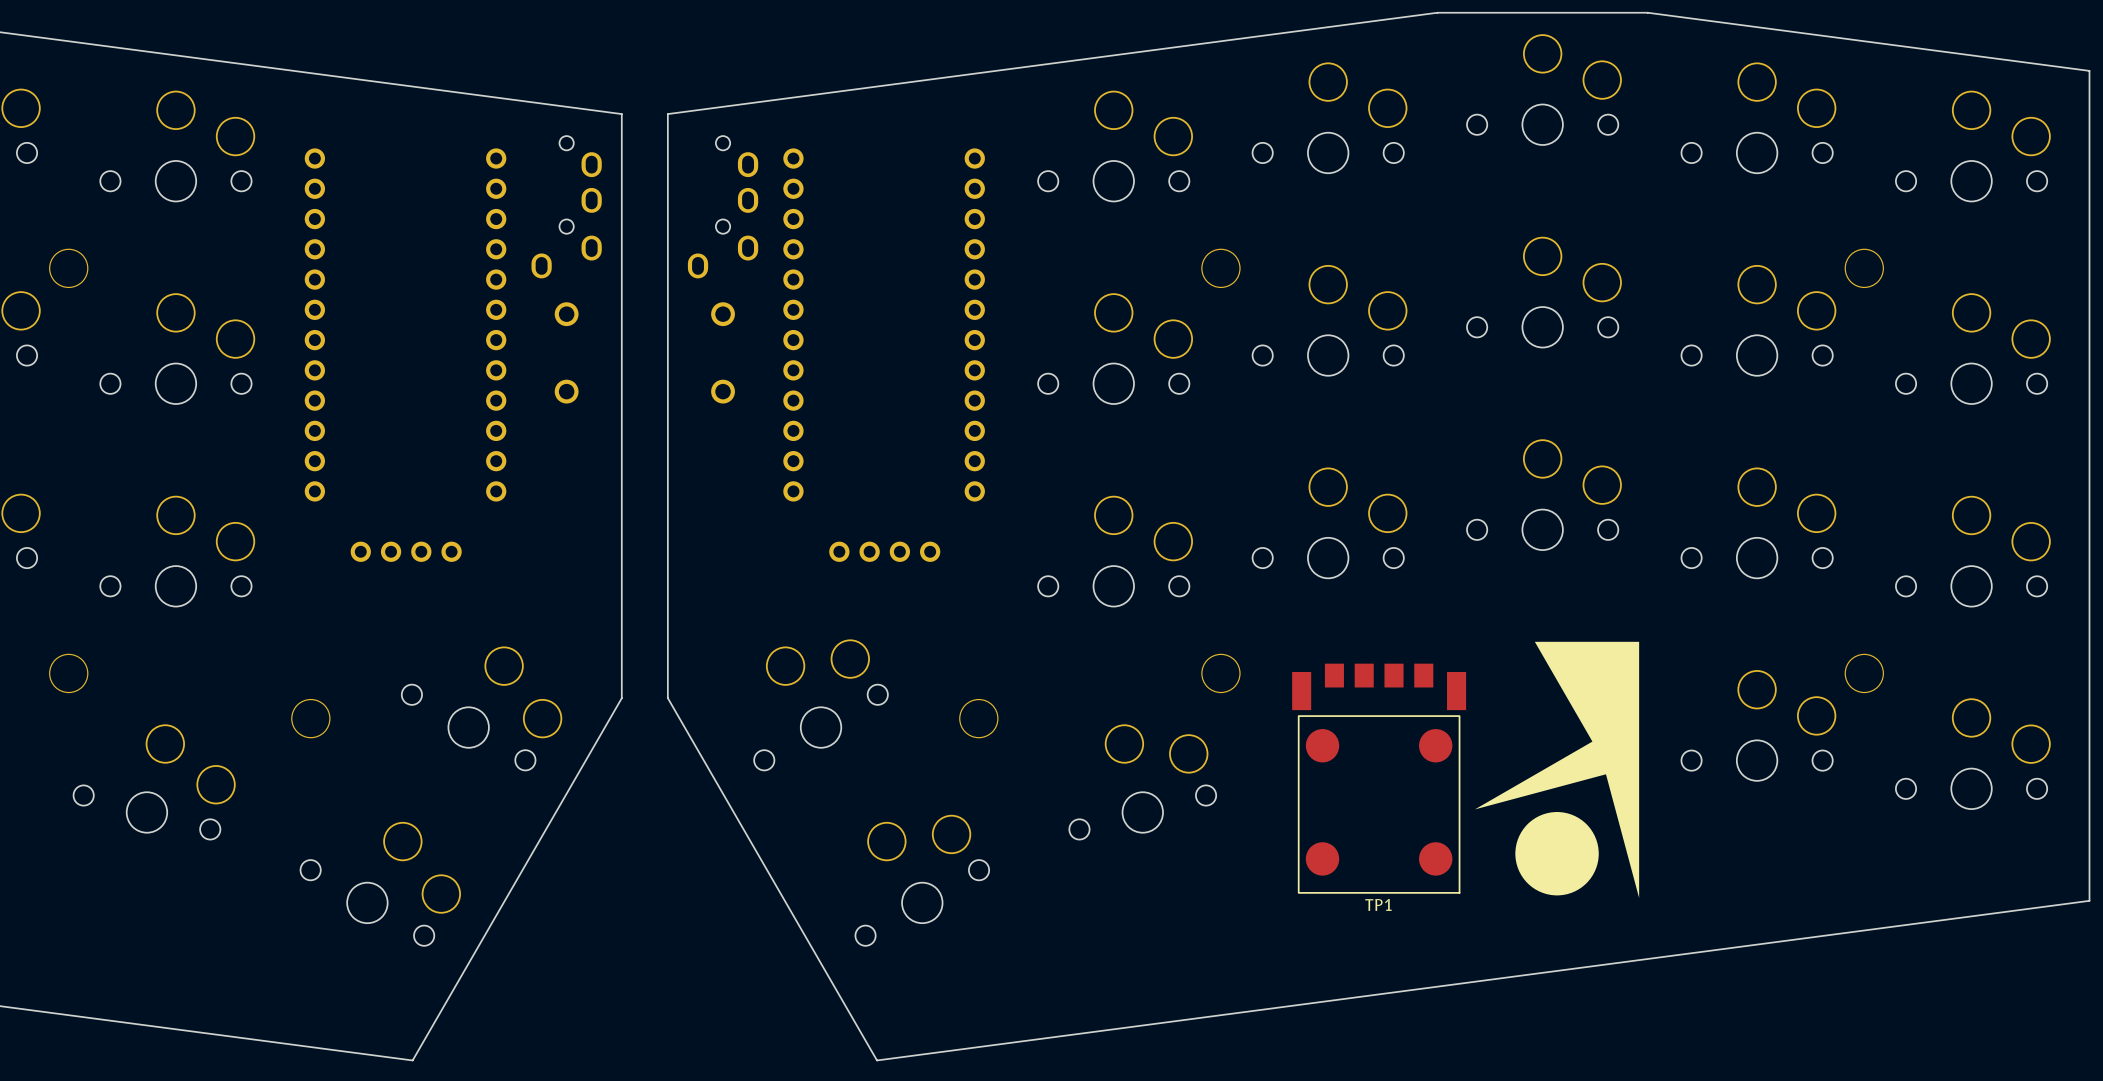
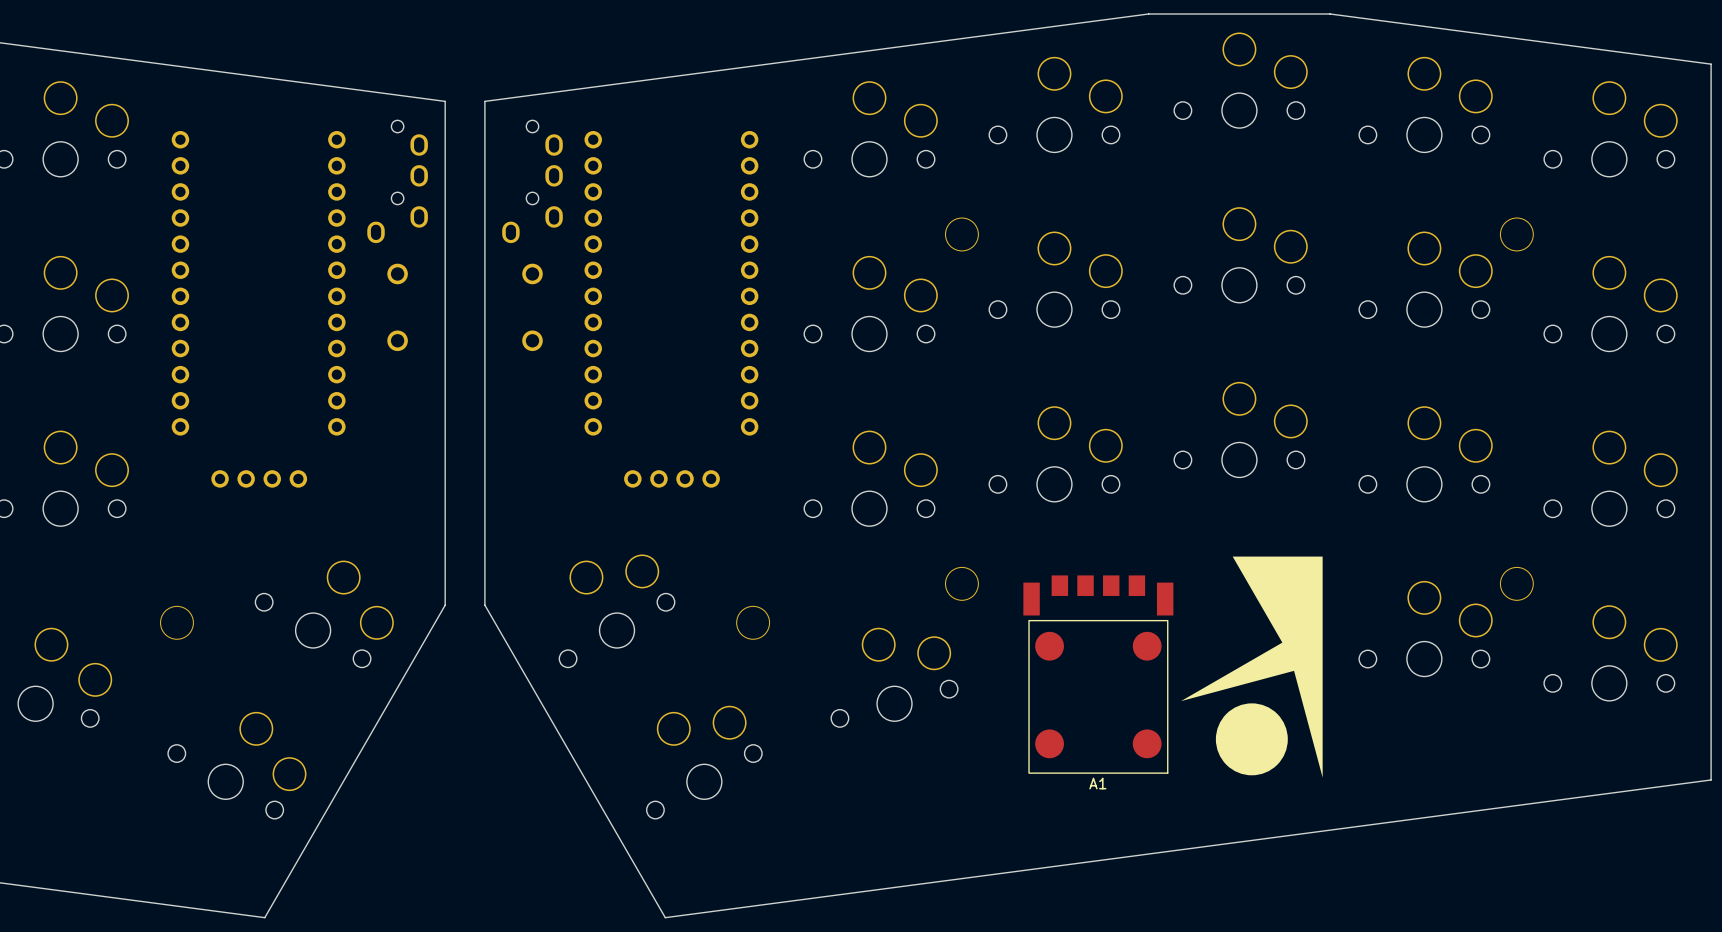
TP1 name: TP1 (1378, 904) -> A1 (1097, 783)

